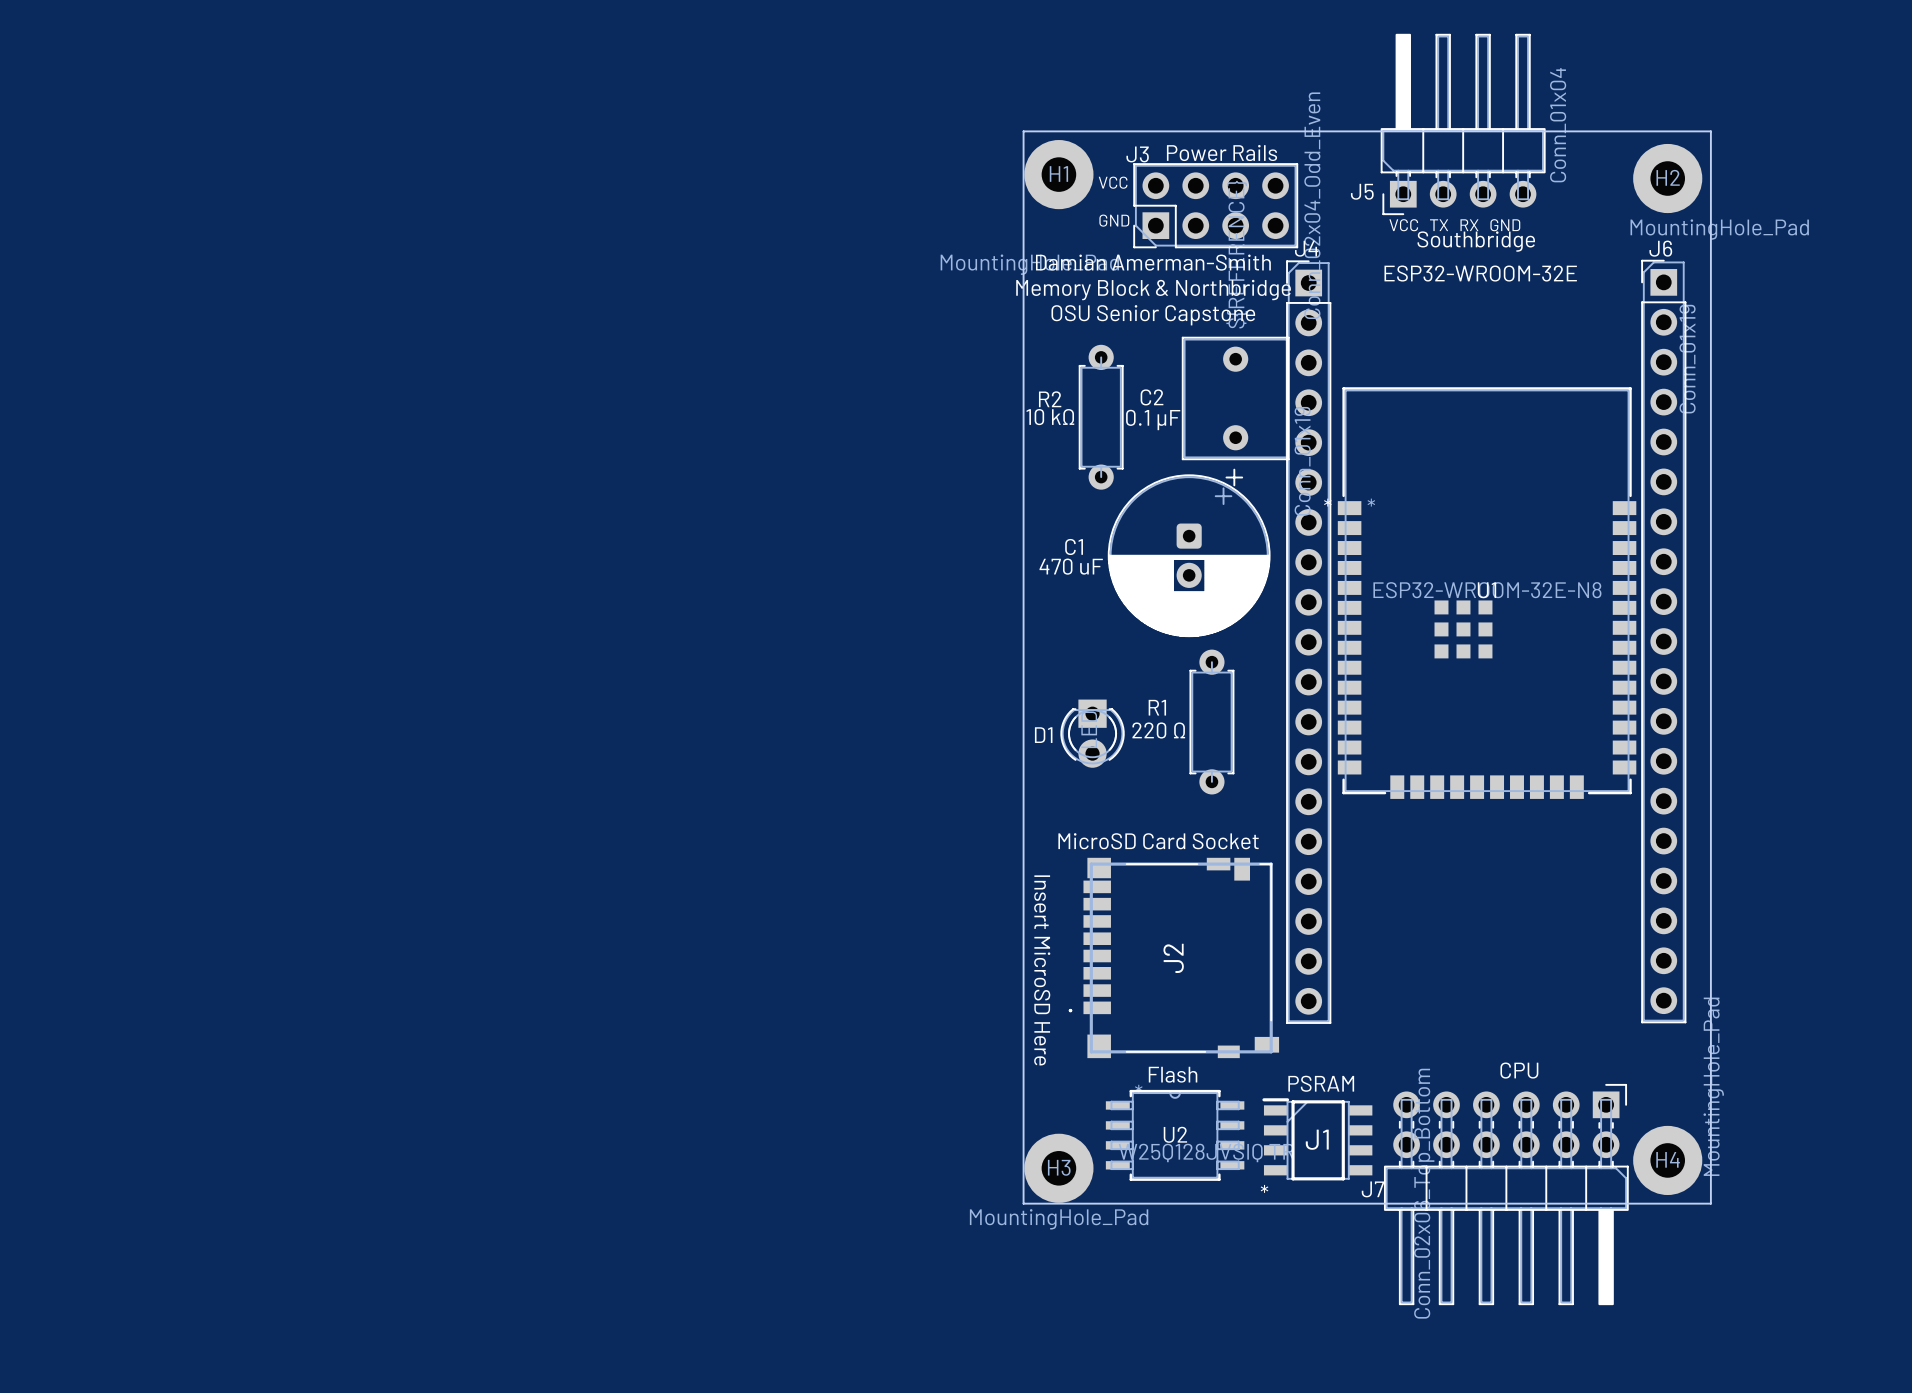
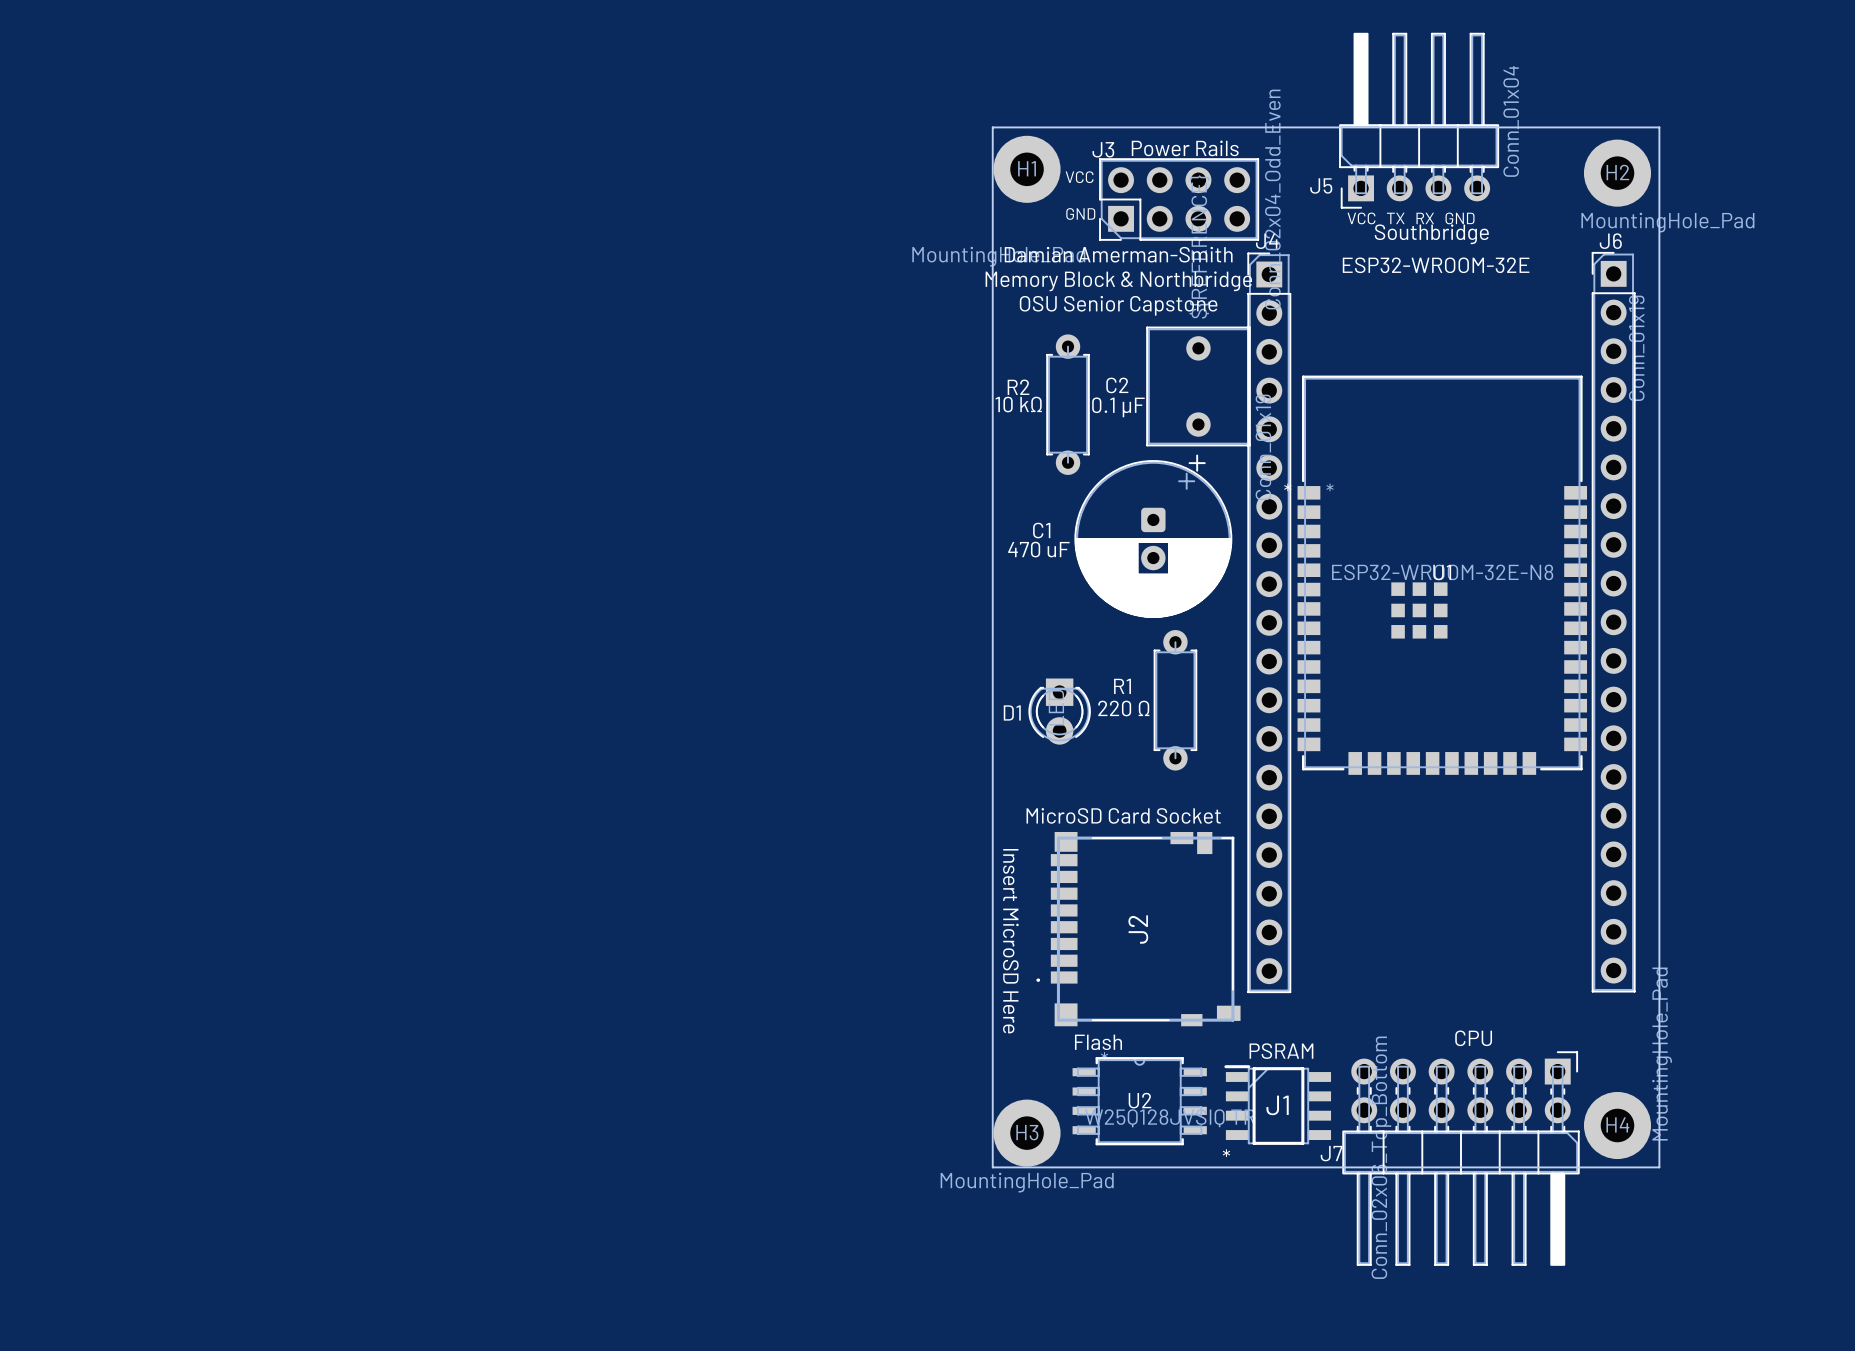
text position: Flash (1173, 1074) -> Flash (1098, 1042)

